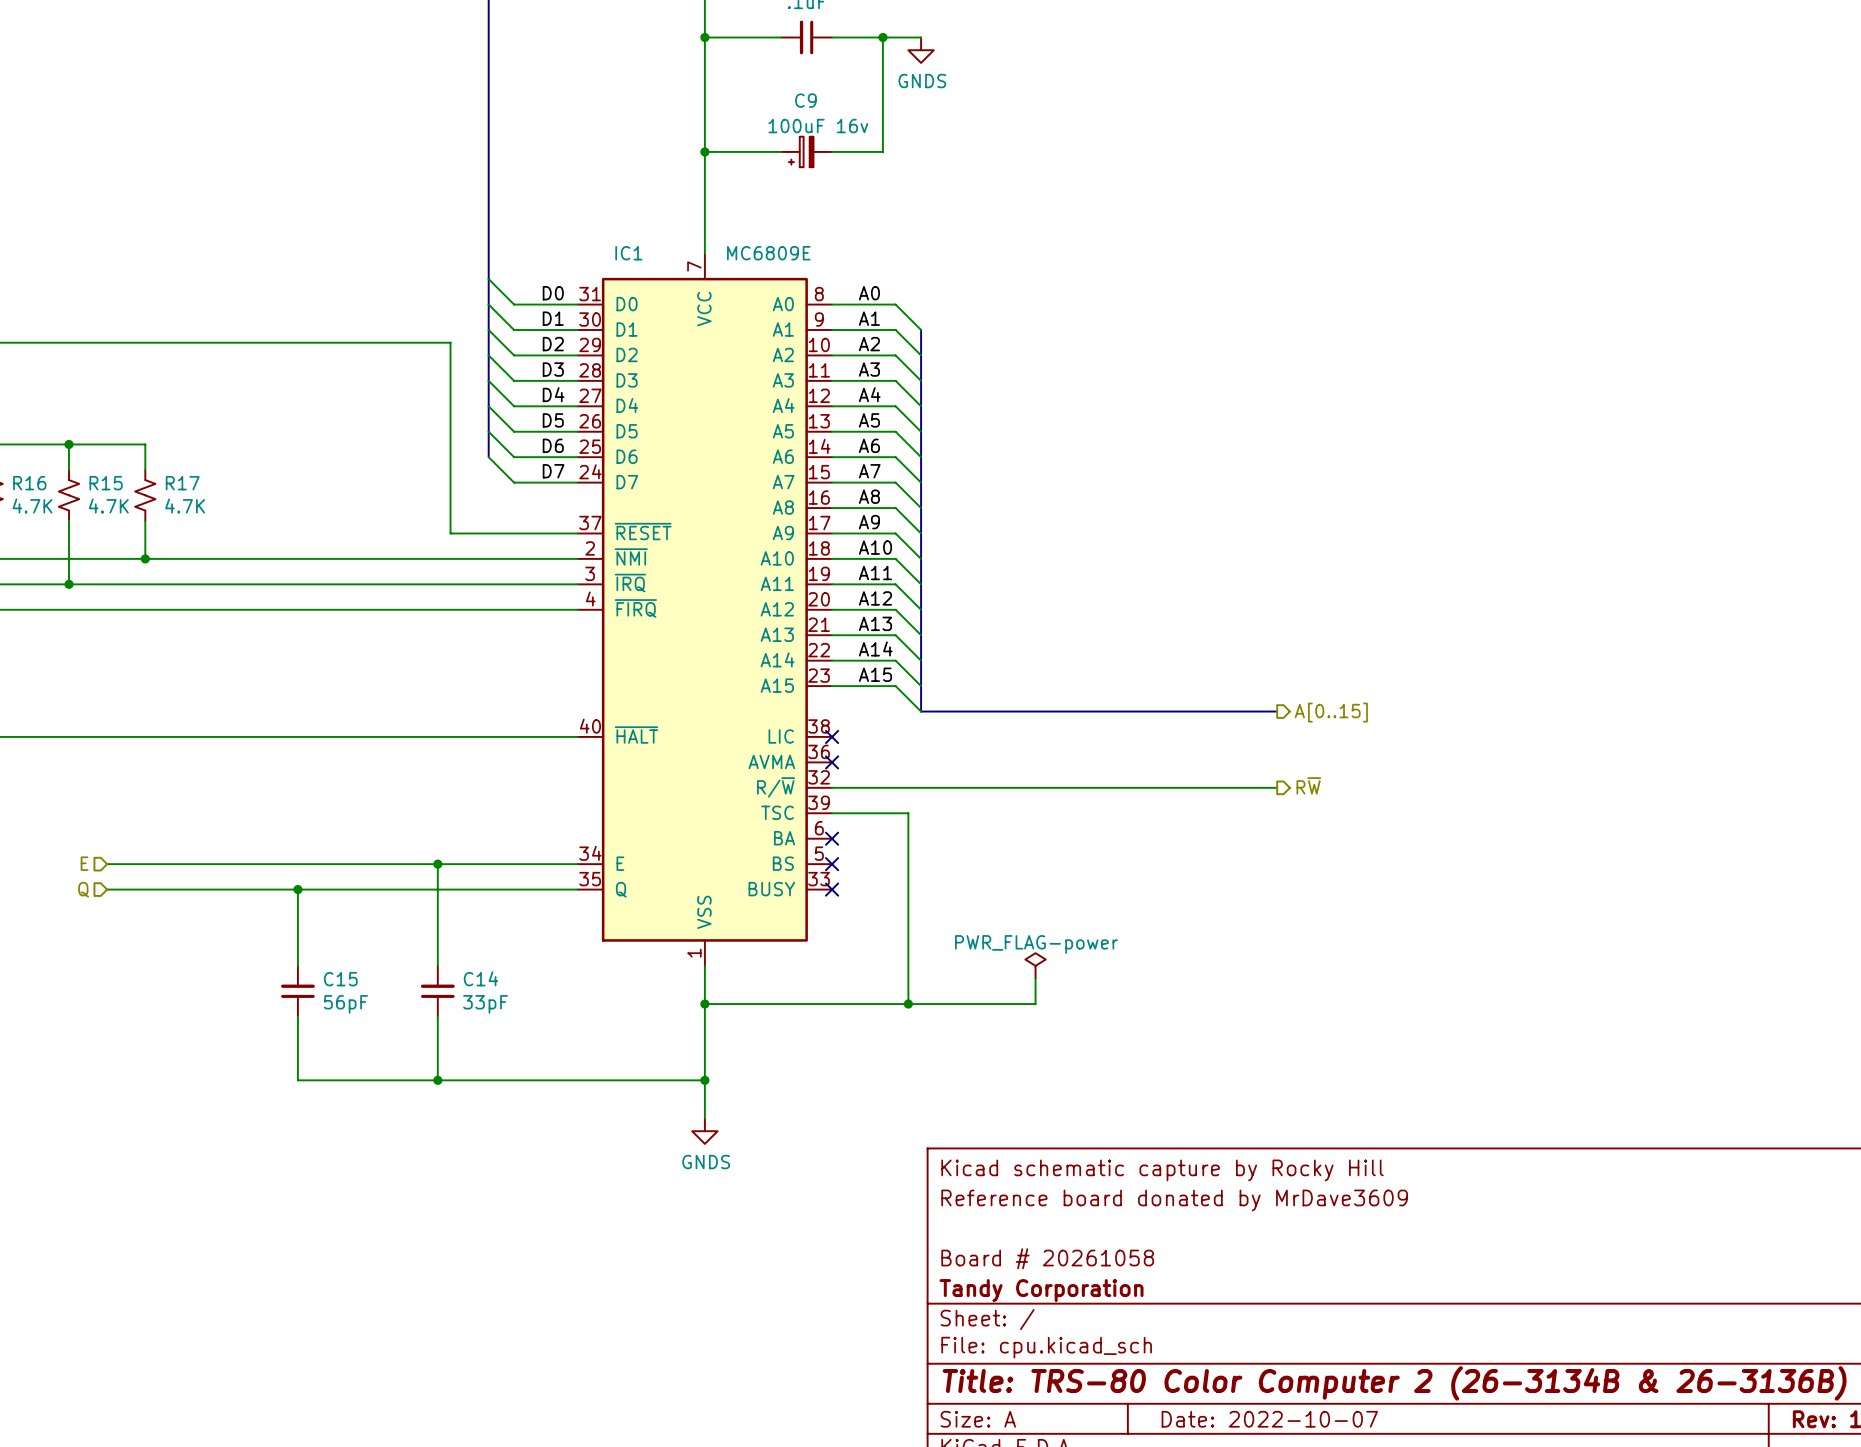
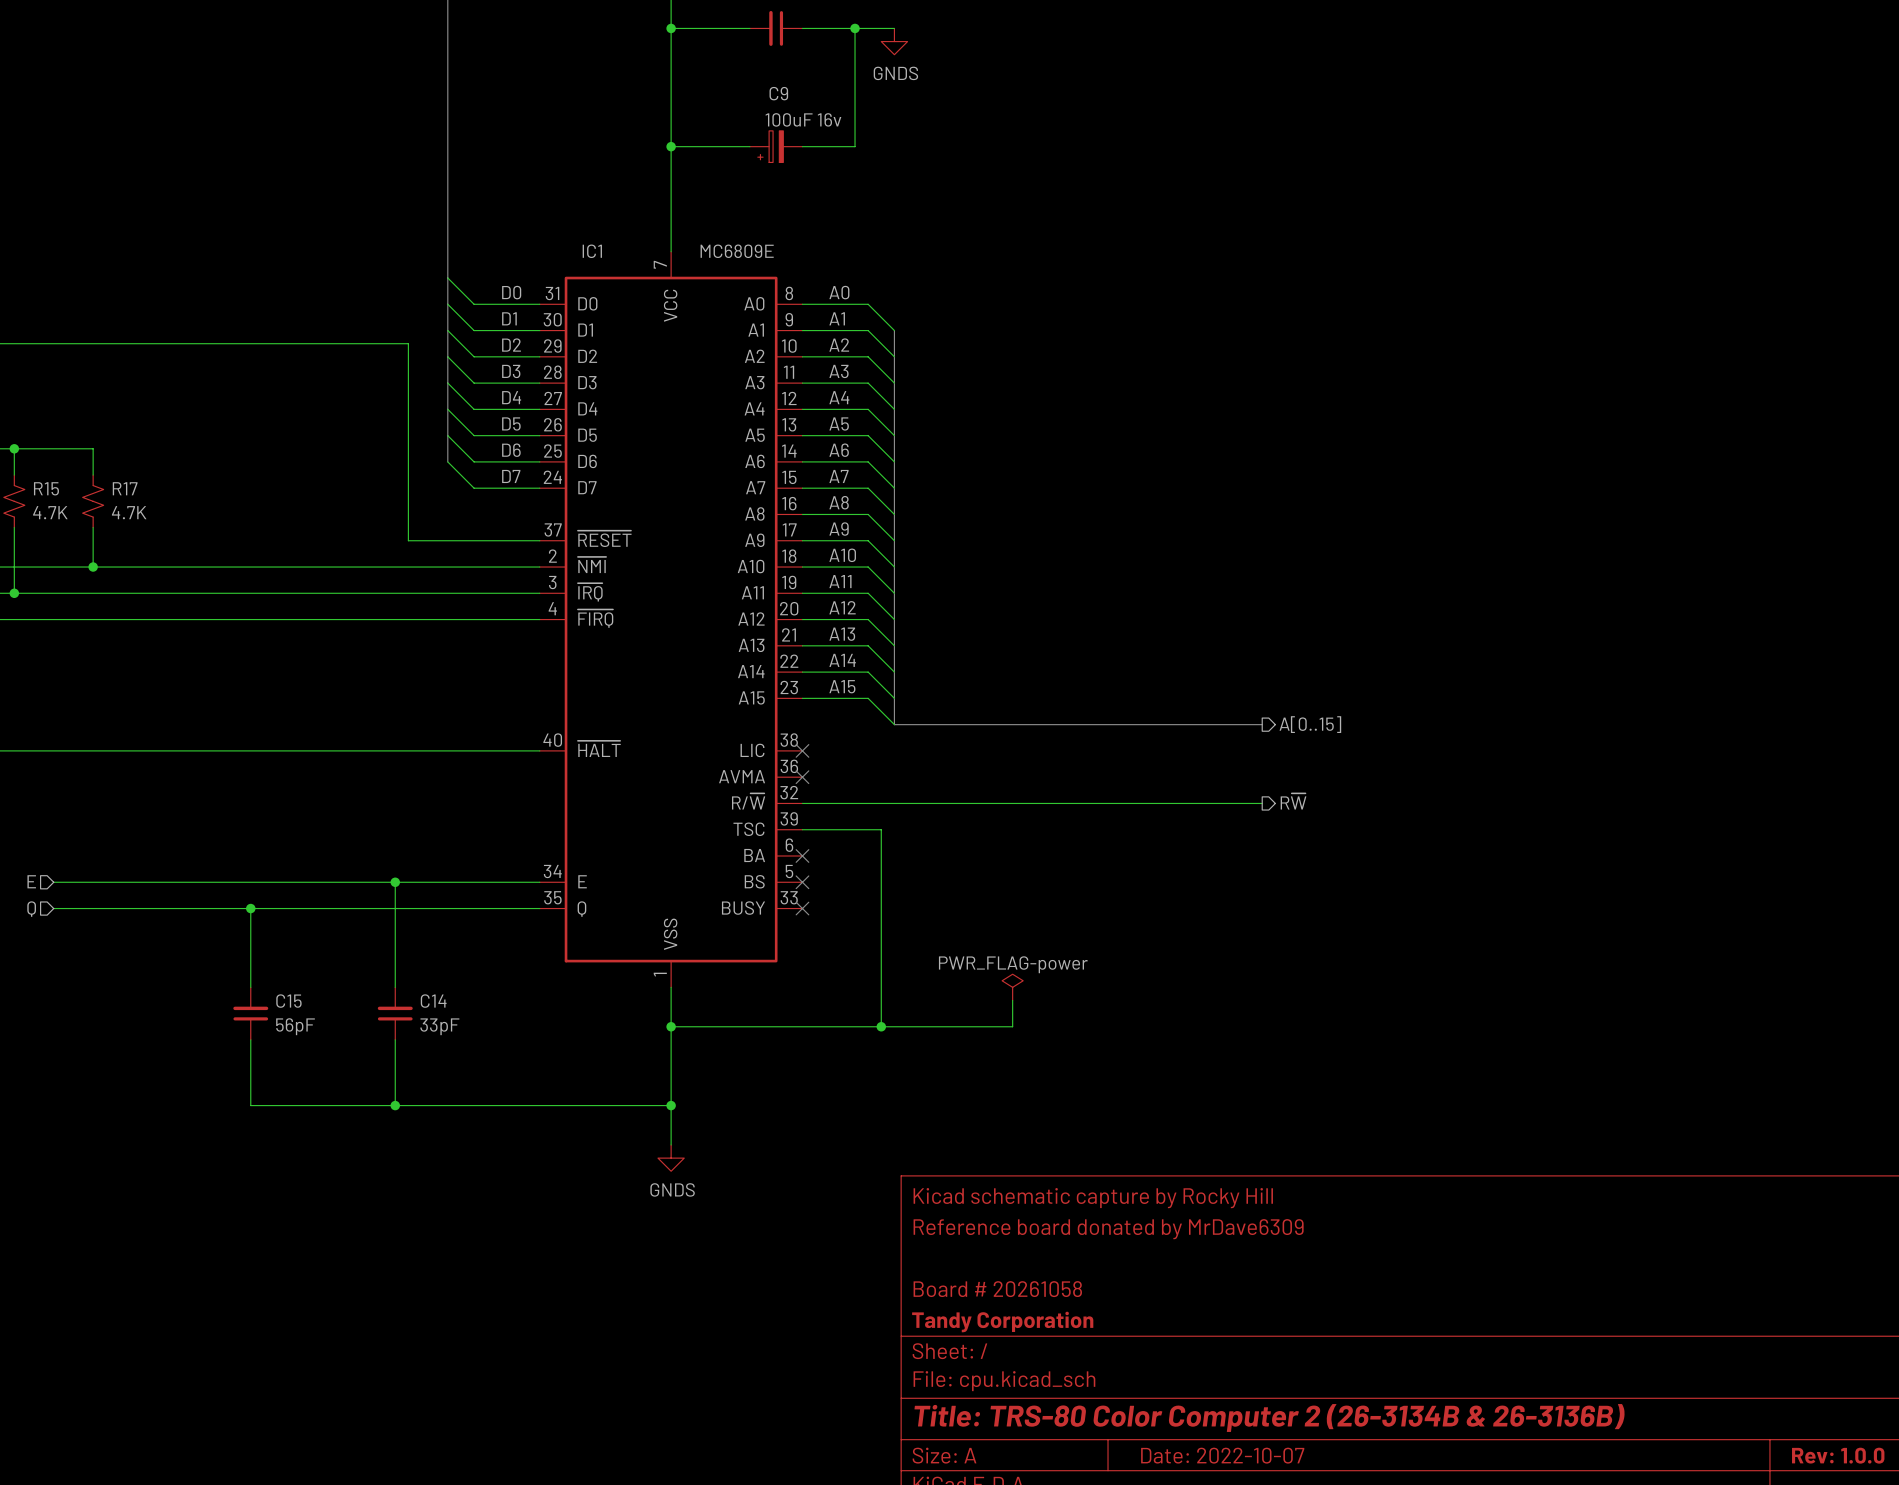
title block: Reference board donated by MrDave3609 (1174, 1200) -> Reference board donated by MrDave6309 (1108, 1229)

